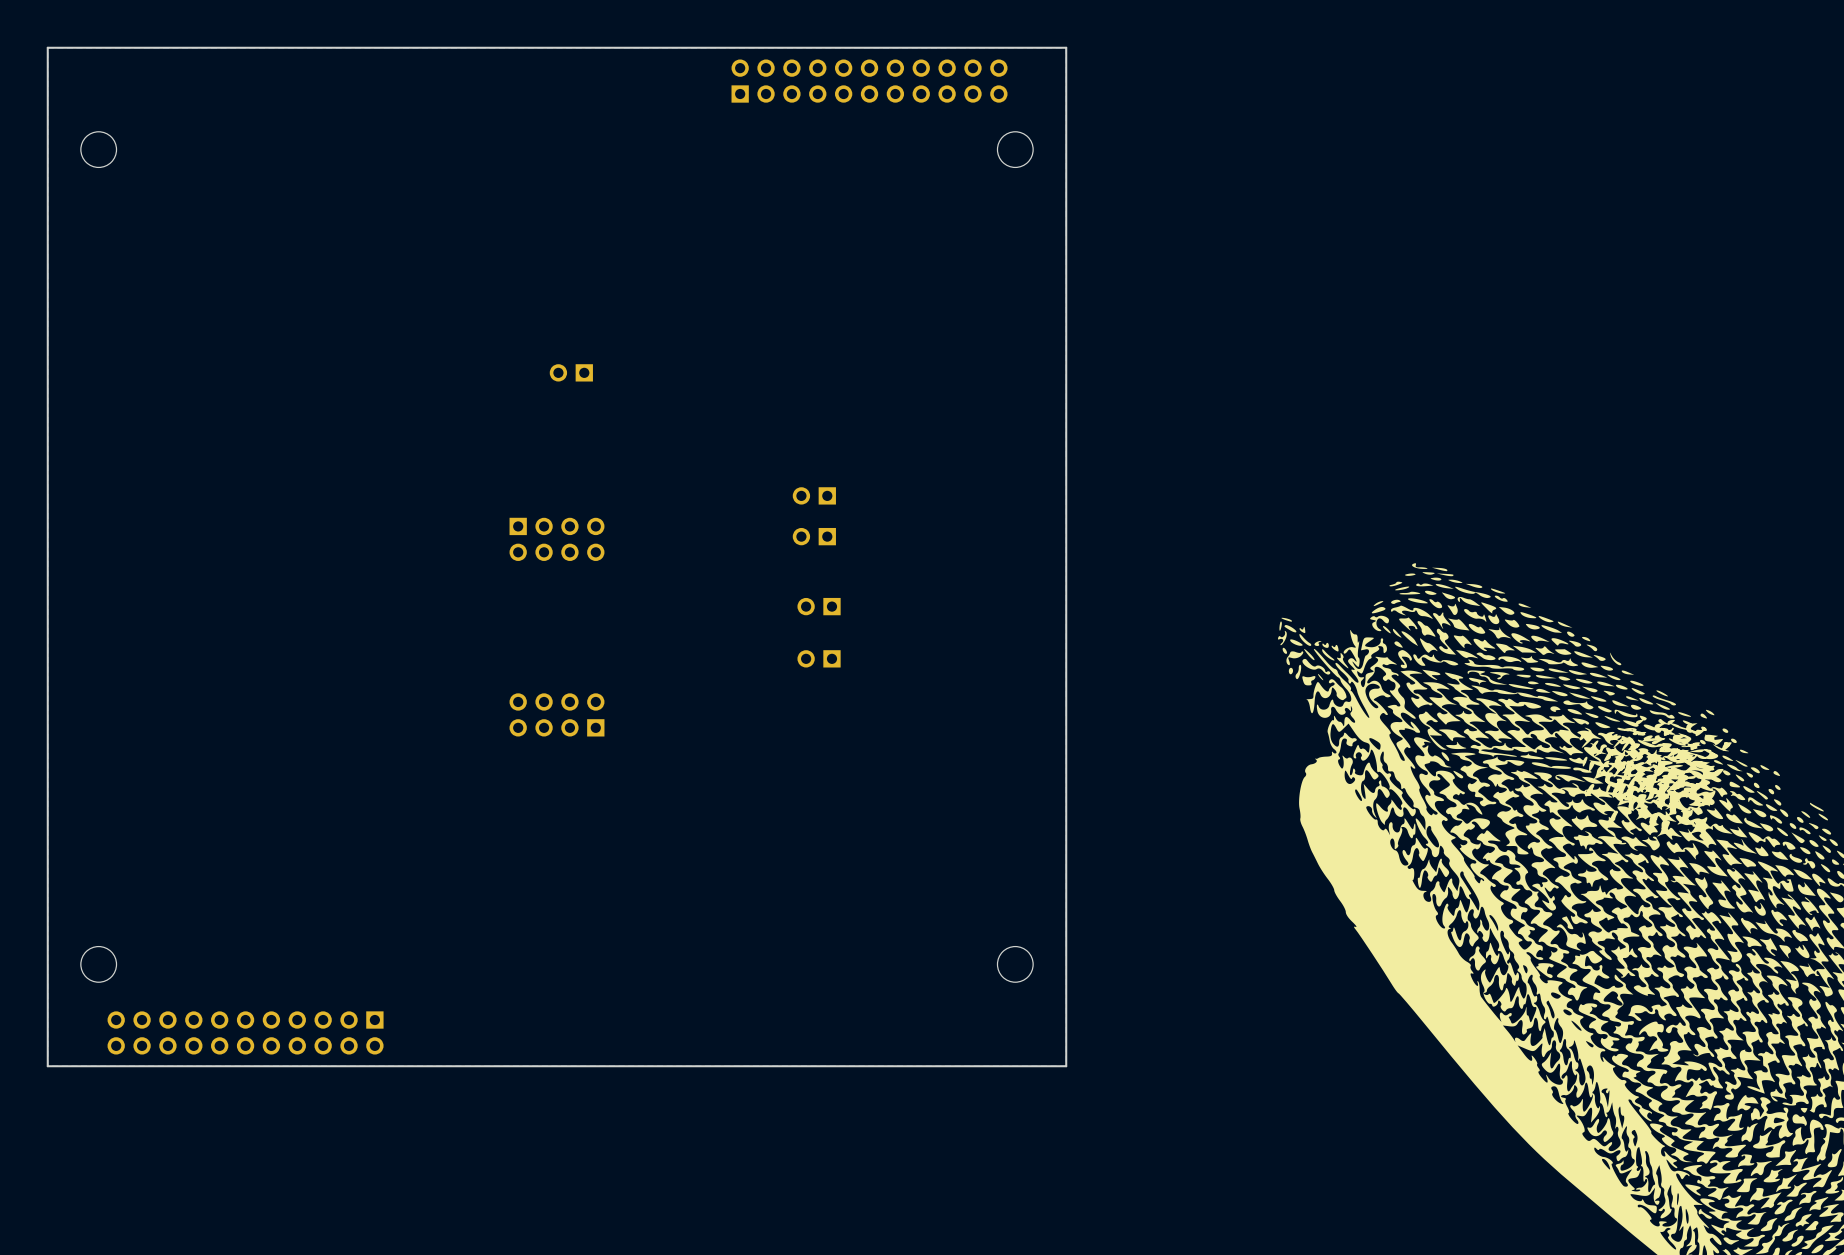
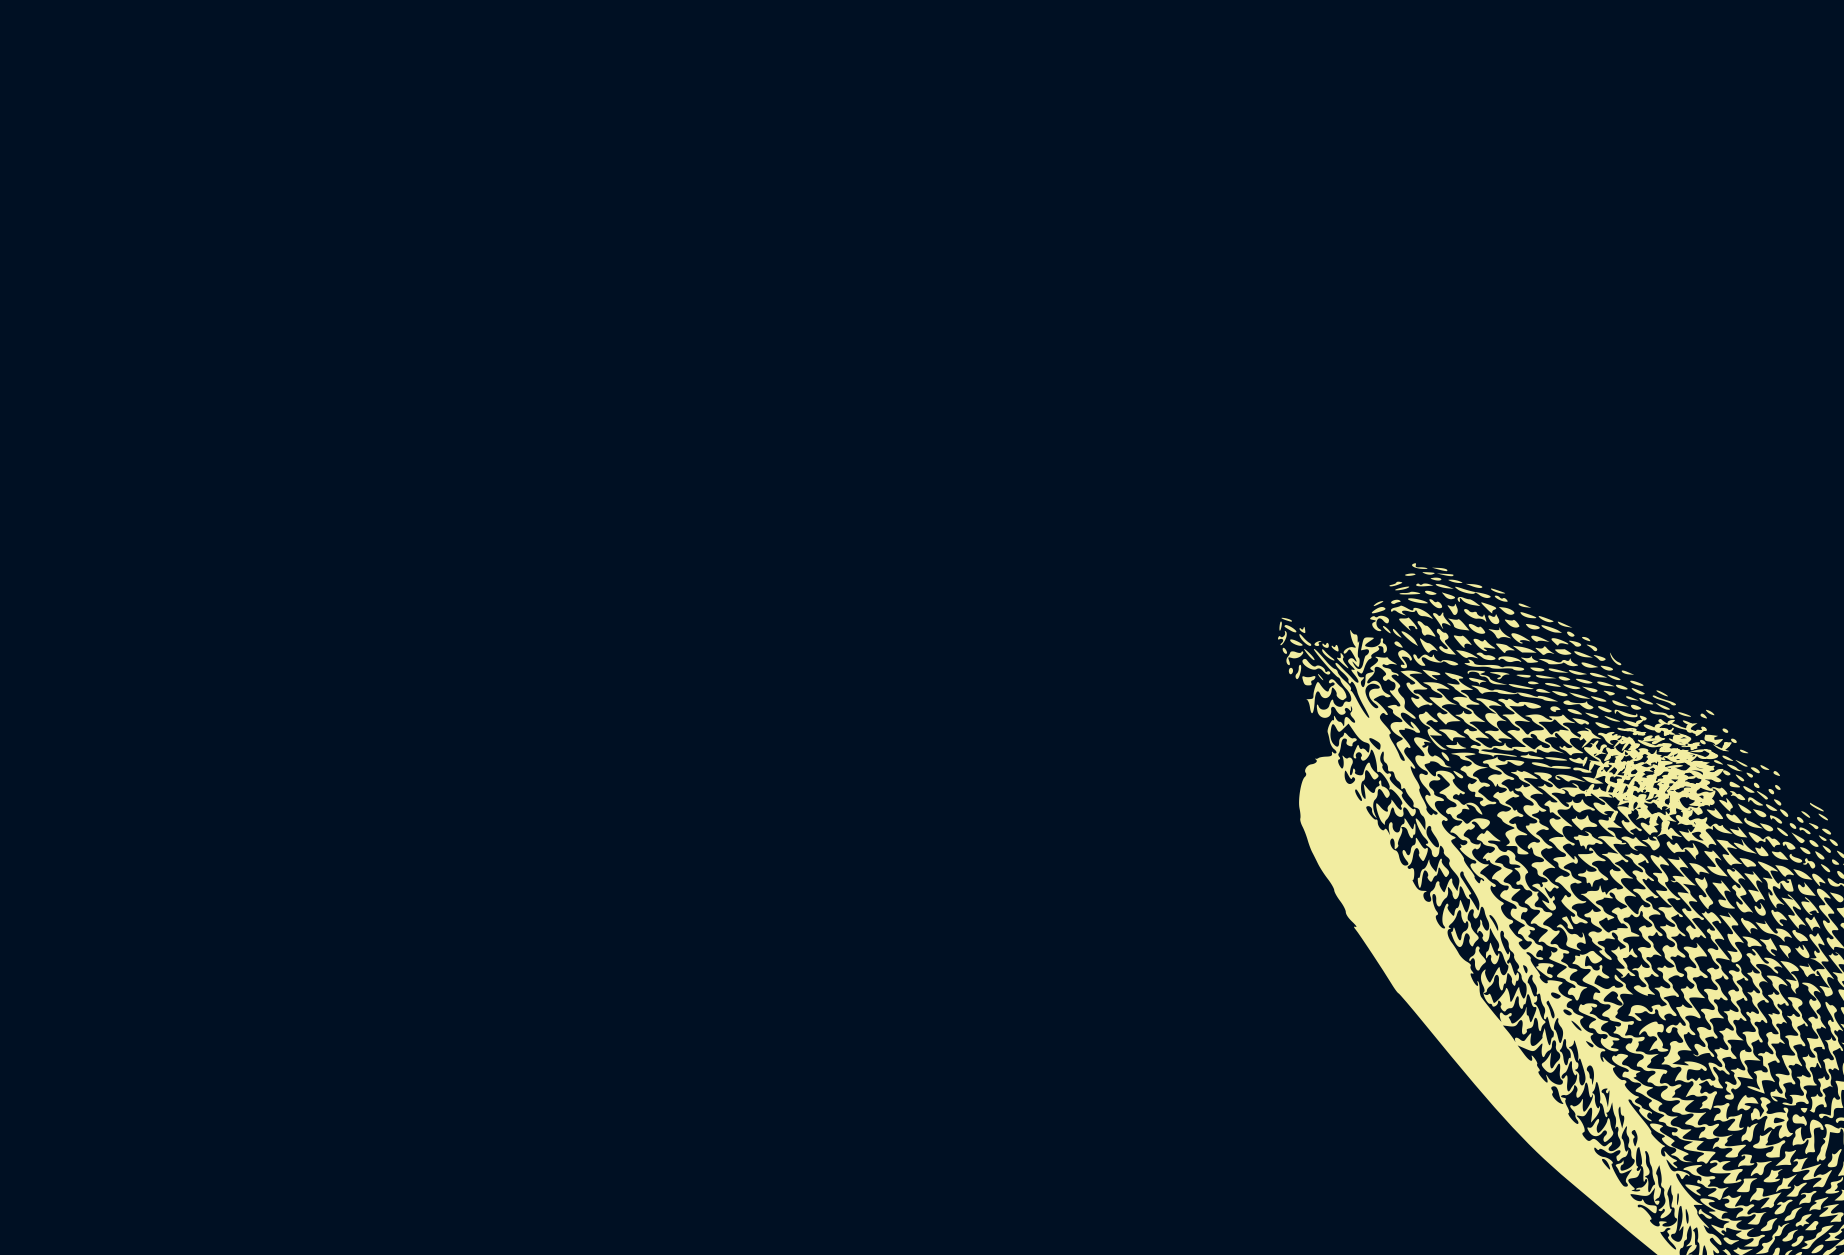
board edge: (1066, 47) (47, 47) (47, 1066) (1066, 1066) (1066, 47) -> none
part: (869, 81) -> none
round board edge: [80, 131, 117, 168] -> none
round board edge: [997, 131, 1034, 168] -> none
part: (571, 372) -> none
part: (814, 495) -> none
part: (814, 536) -> none
part: (557, 539) -> none
part: (819, 606) -> none
part: (819, 658) -> none
part: (557, 714) -> none
round board edge: [80, 946, 117, 983] -> none
round board edge: [997, 946, 1034, 983] -> none
part: (245, 1032) -> none

